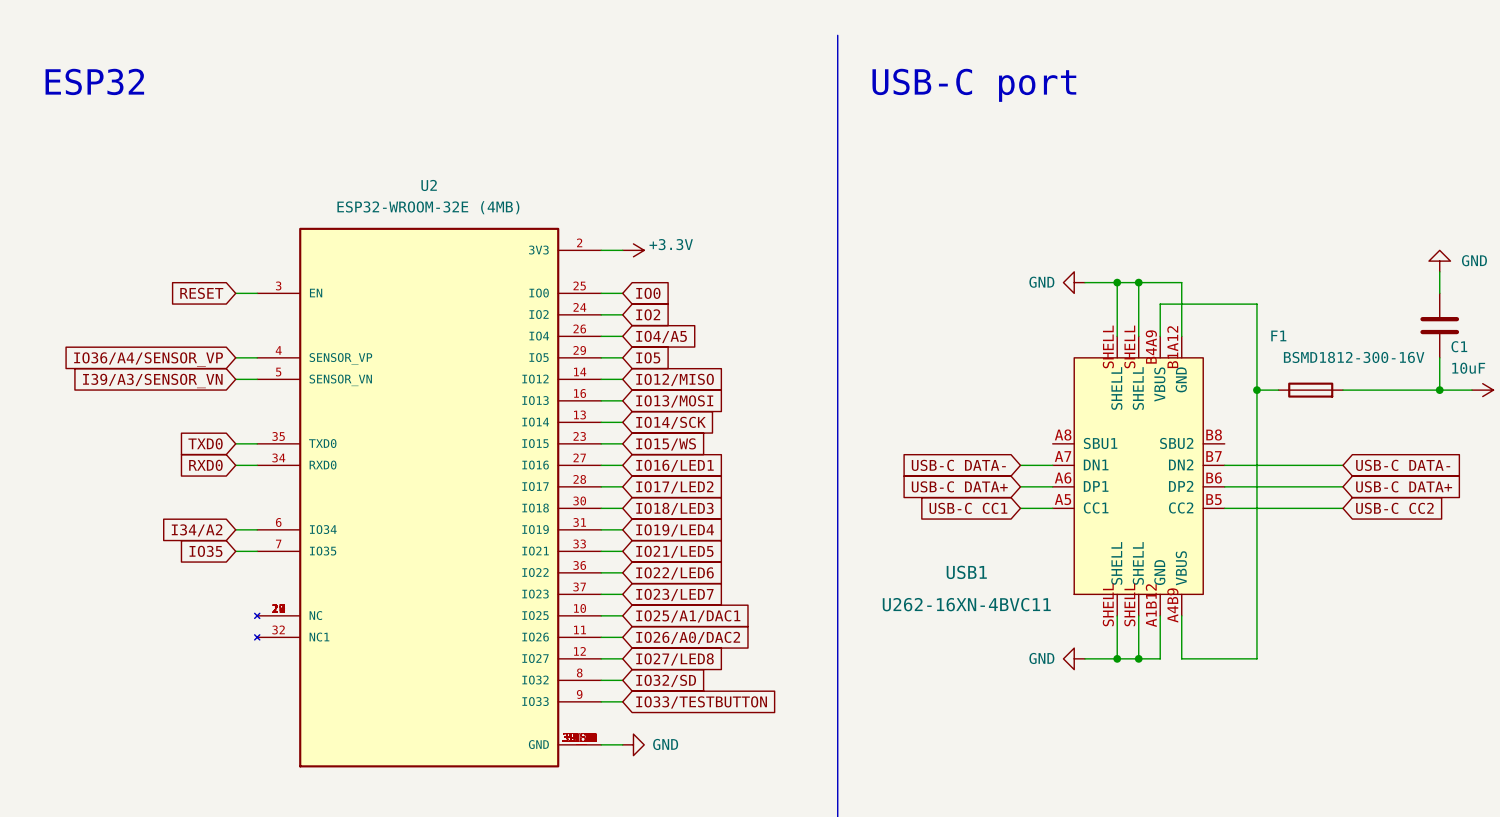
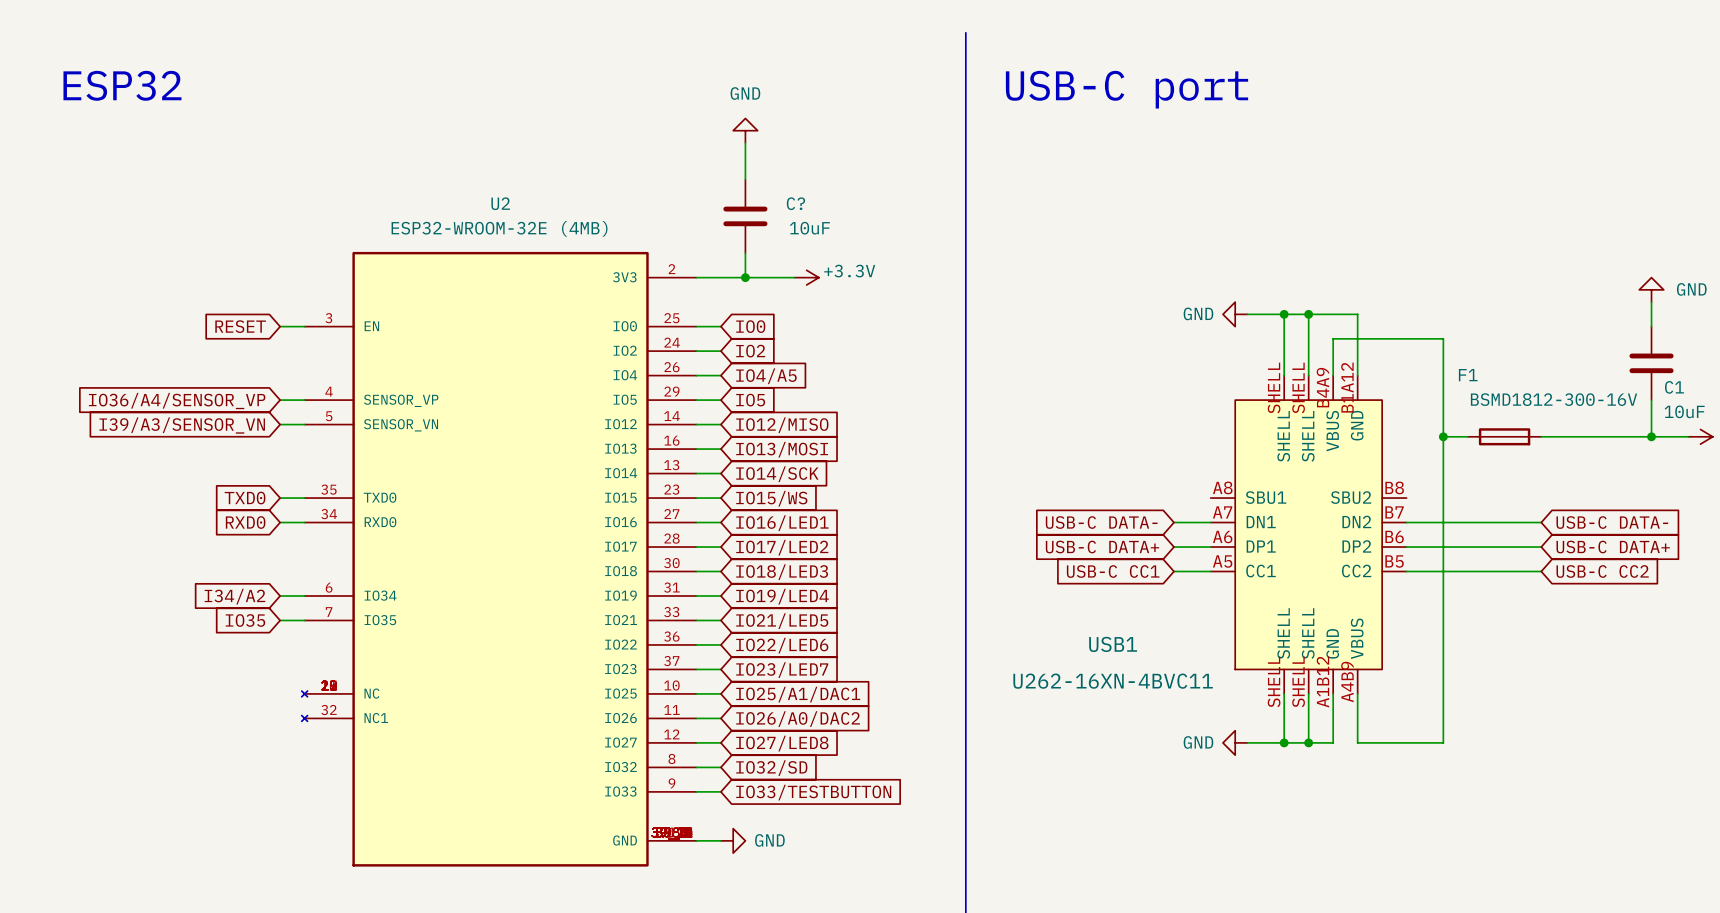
power symbol: none -> GND (745, 130)
wire: none -> (745, 142) (745, 179)
C?: none -> 10uF (745, 216)
wire: none -> (745, 253) (745, 277)
wire: none -> (720, 277) (794, 277)
power symbol position: +3.3V (633, 250) -> +3.3V (806, 277)
junction: none -> (745, 277)

